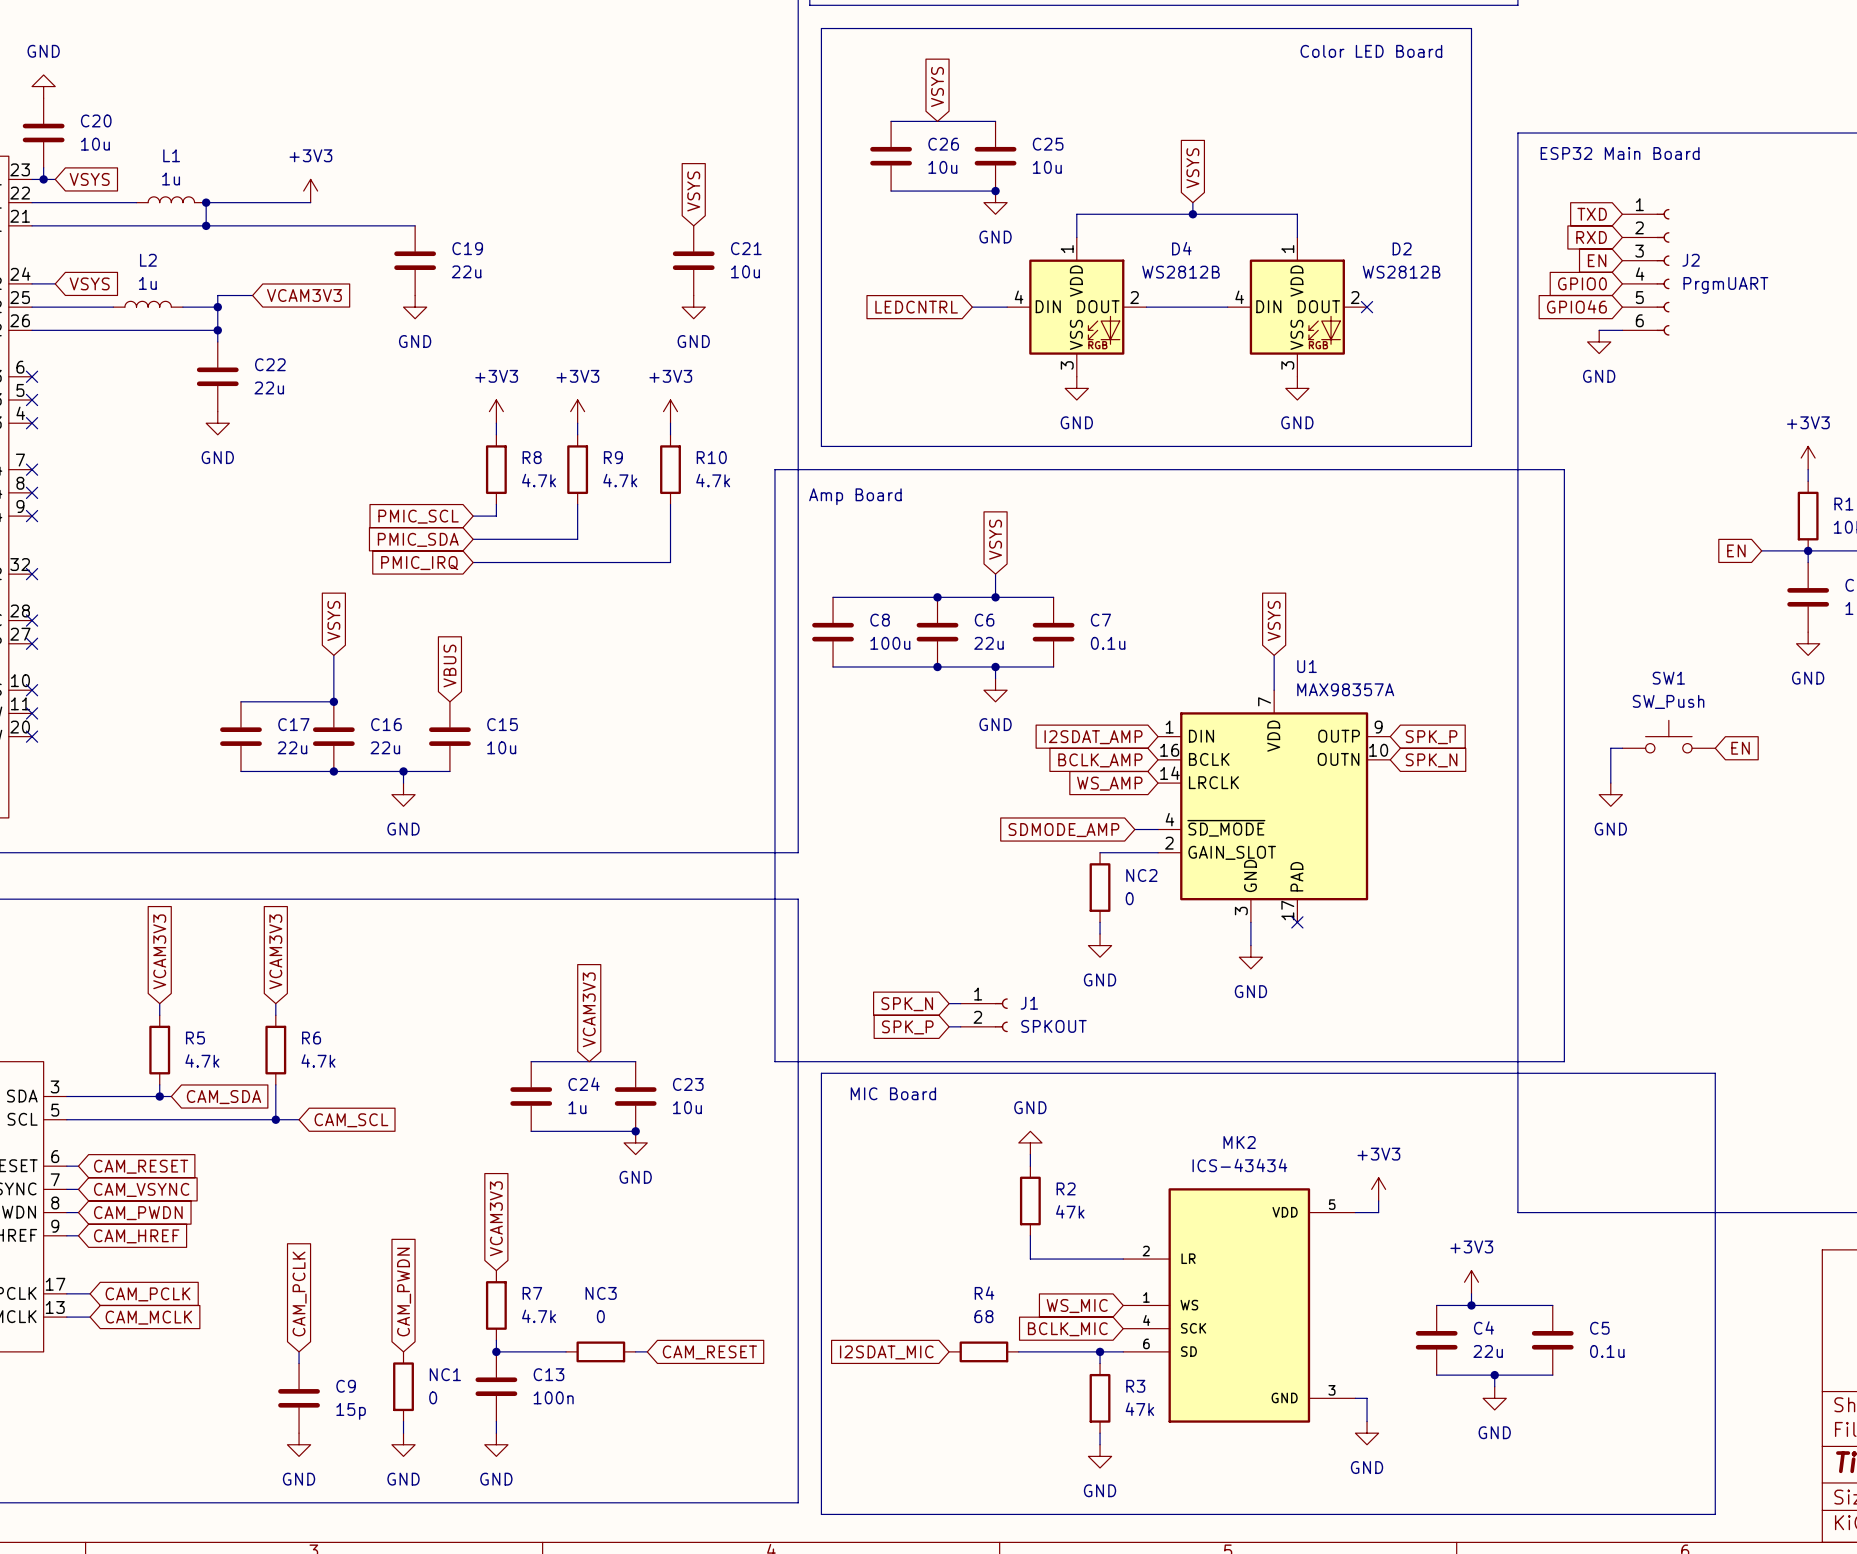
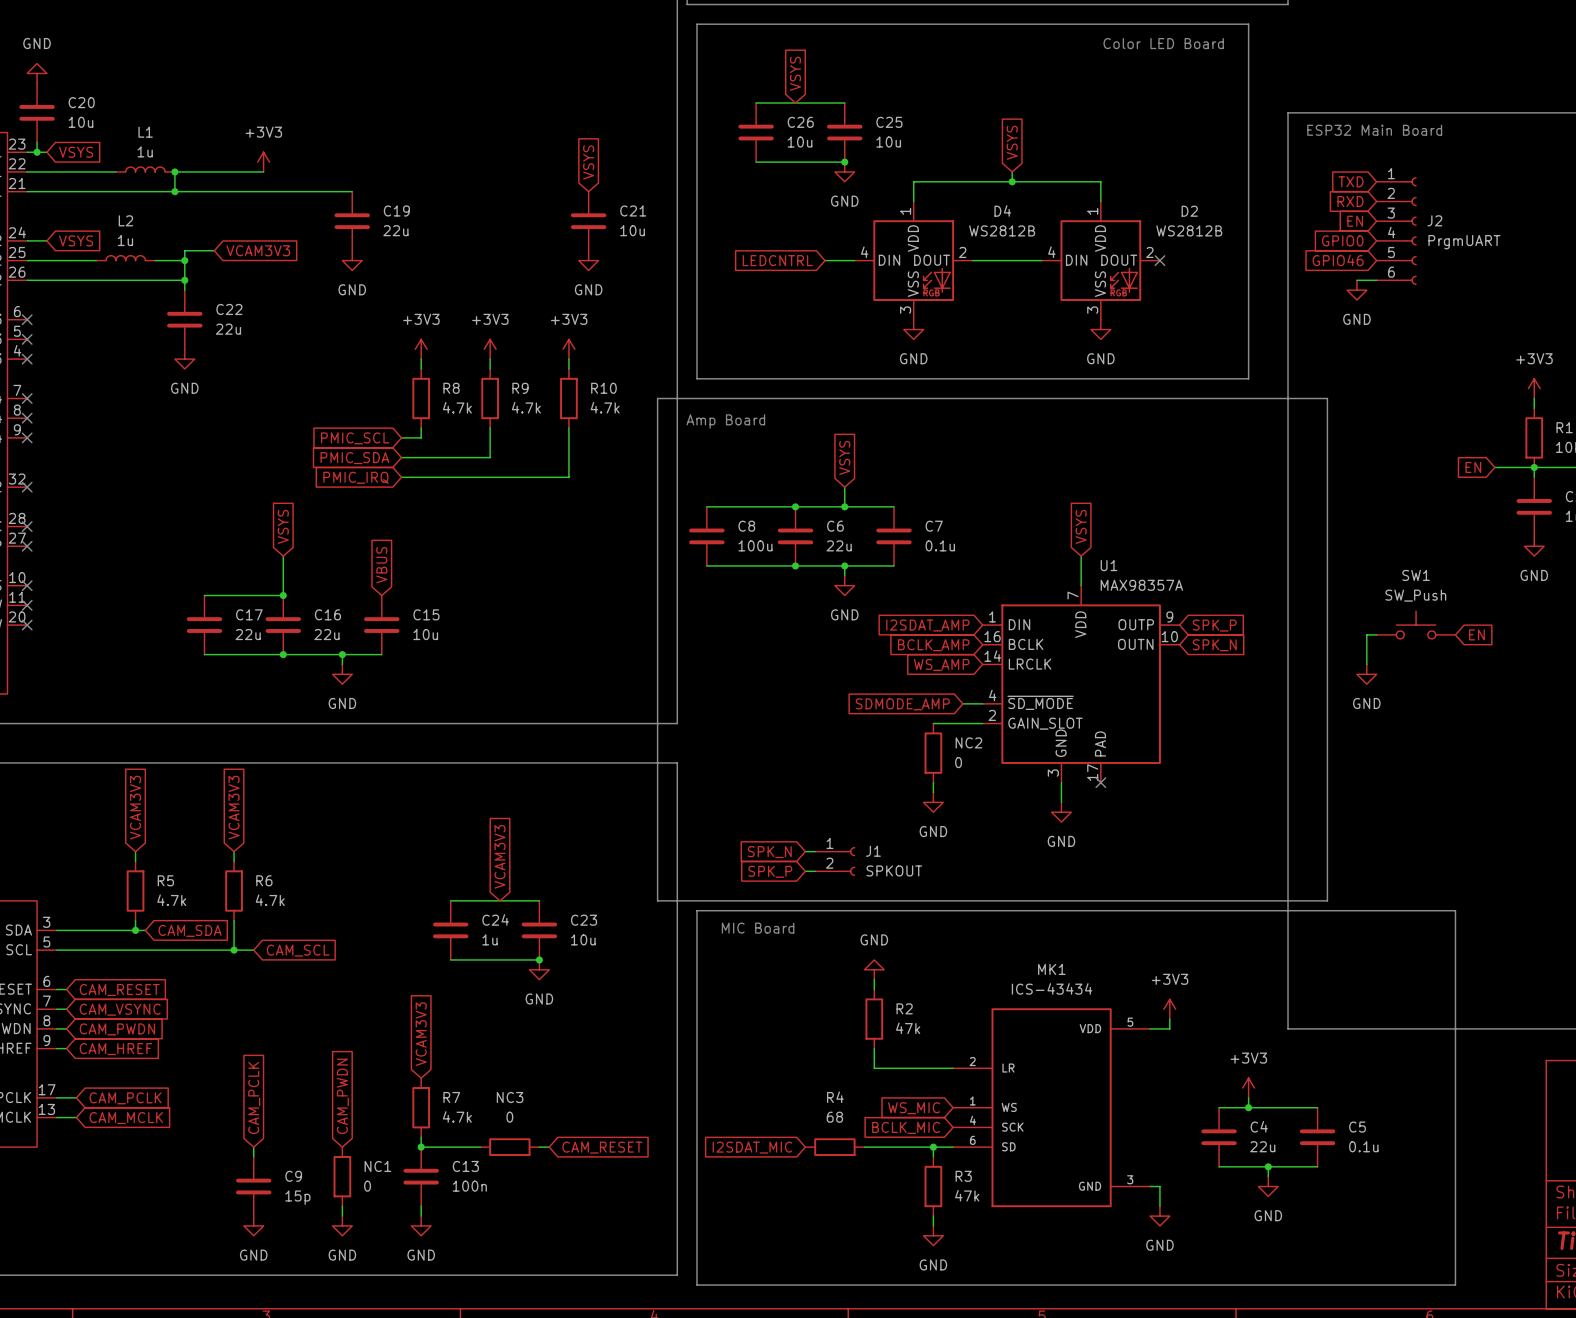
MK2 name: MK2 (1239, 1142) -> MK1 (1051, 969)

